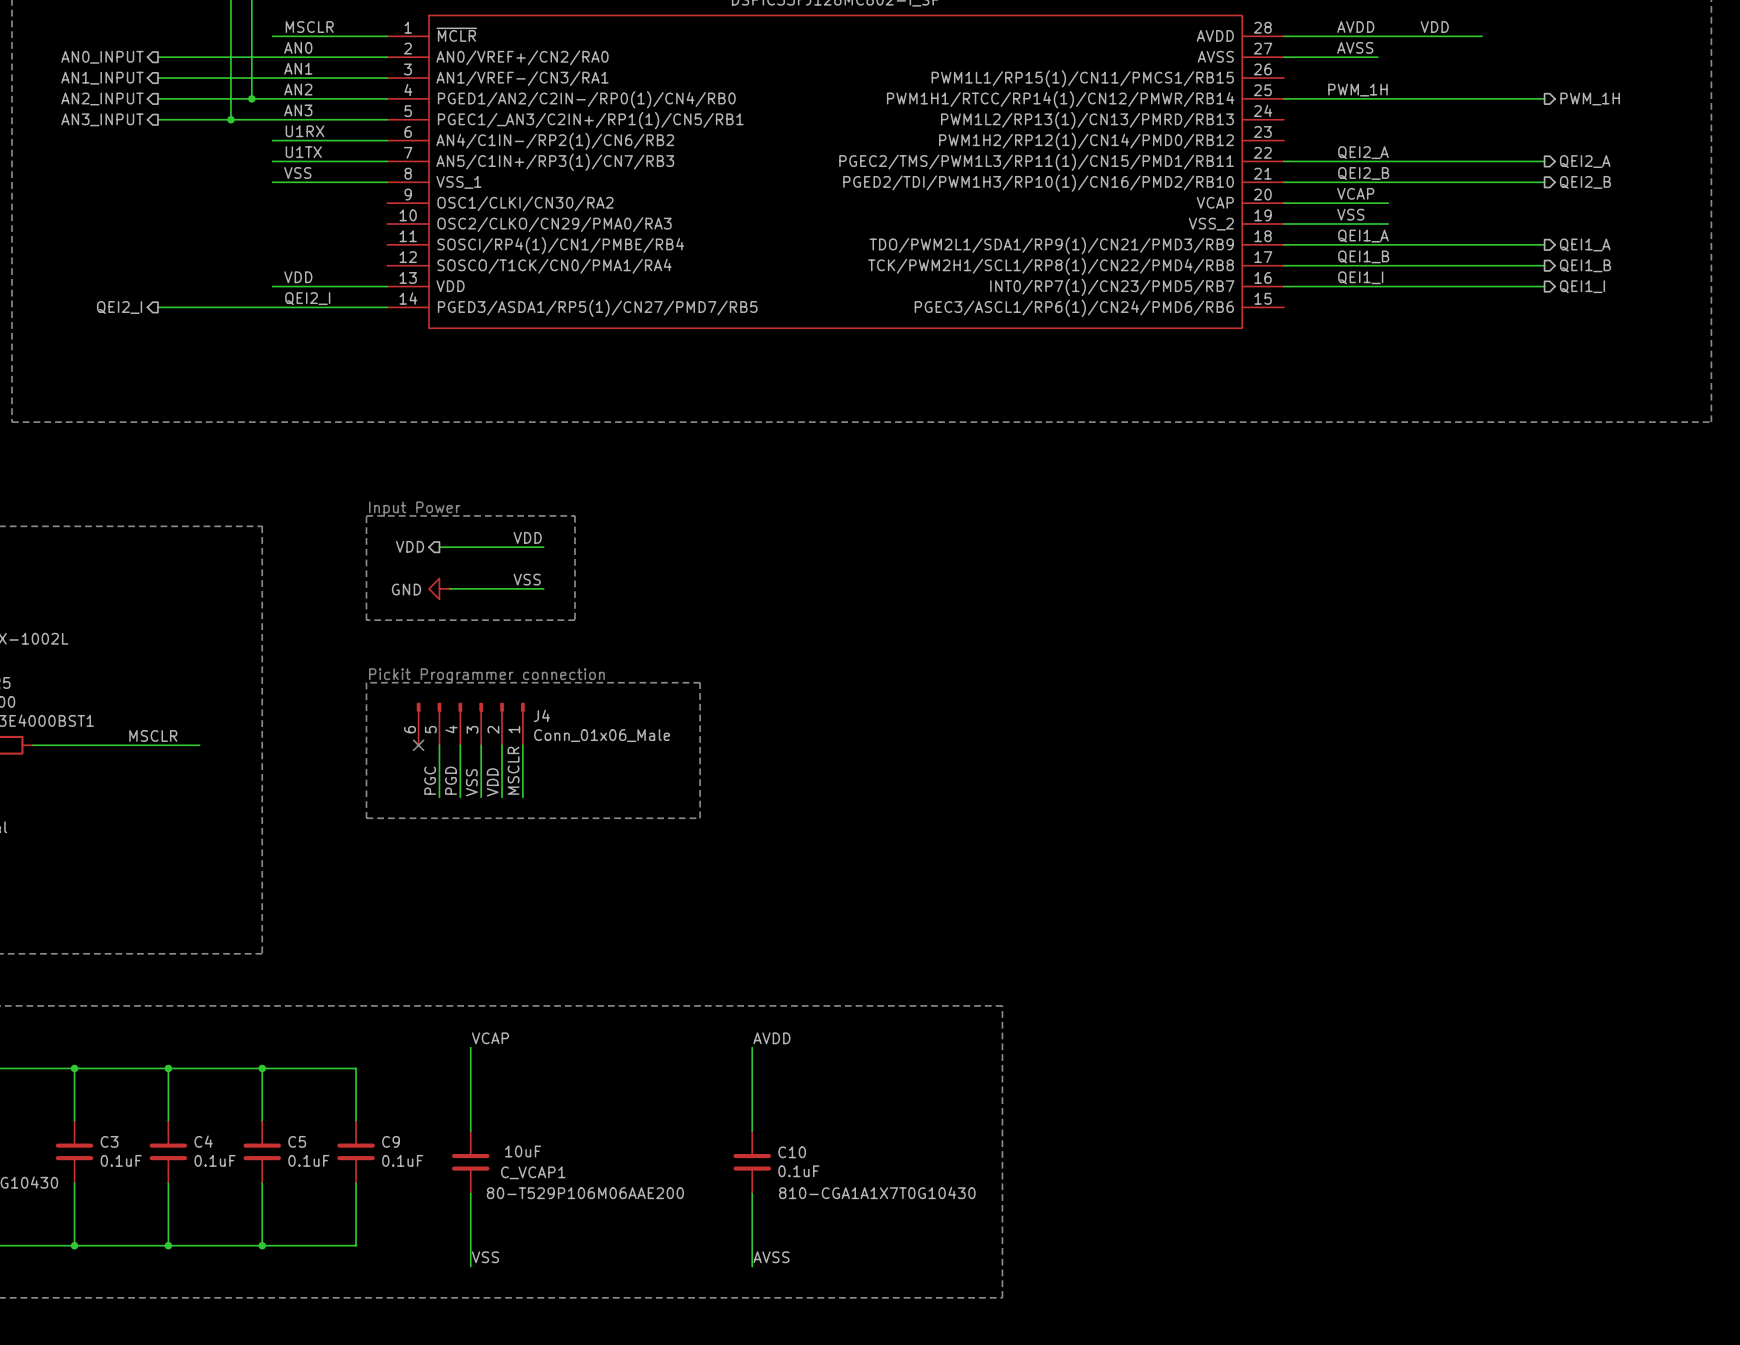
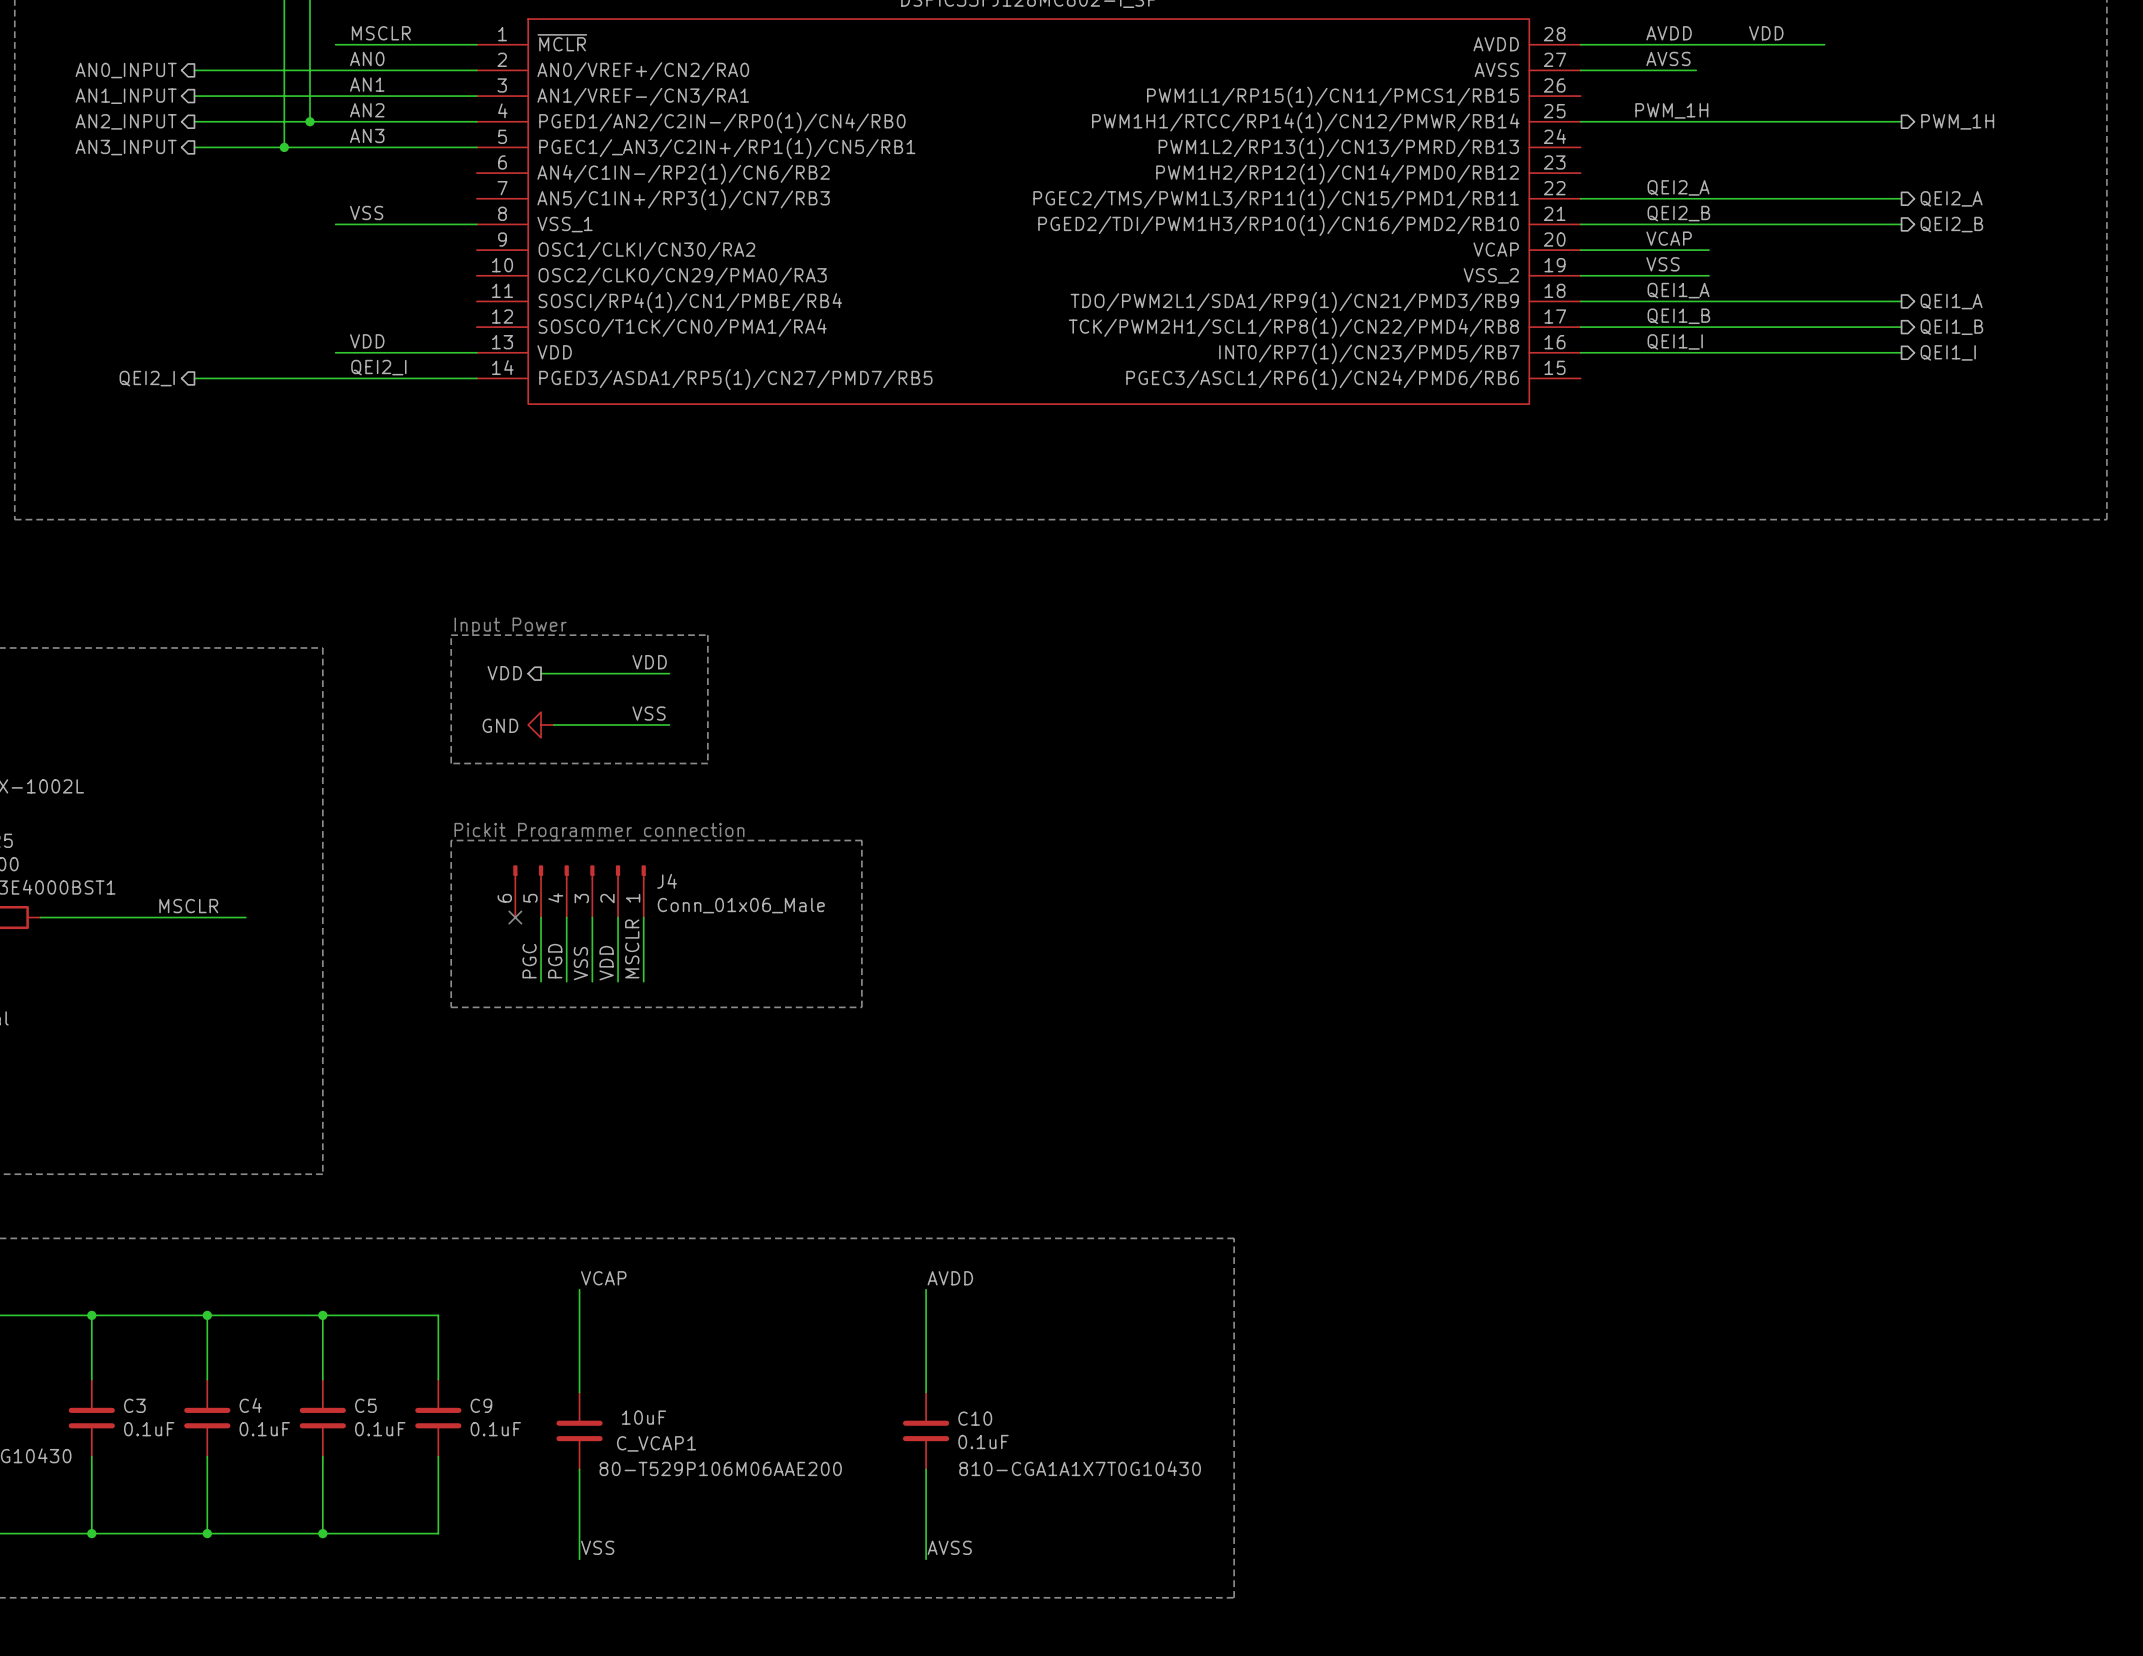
label: U1RX (305, 131) -> none
wire: (272, 140) (387, 140) -> none
label: U1TX (303, 152) -> none
wire: (272, 161) (387, 161) -> none

